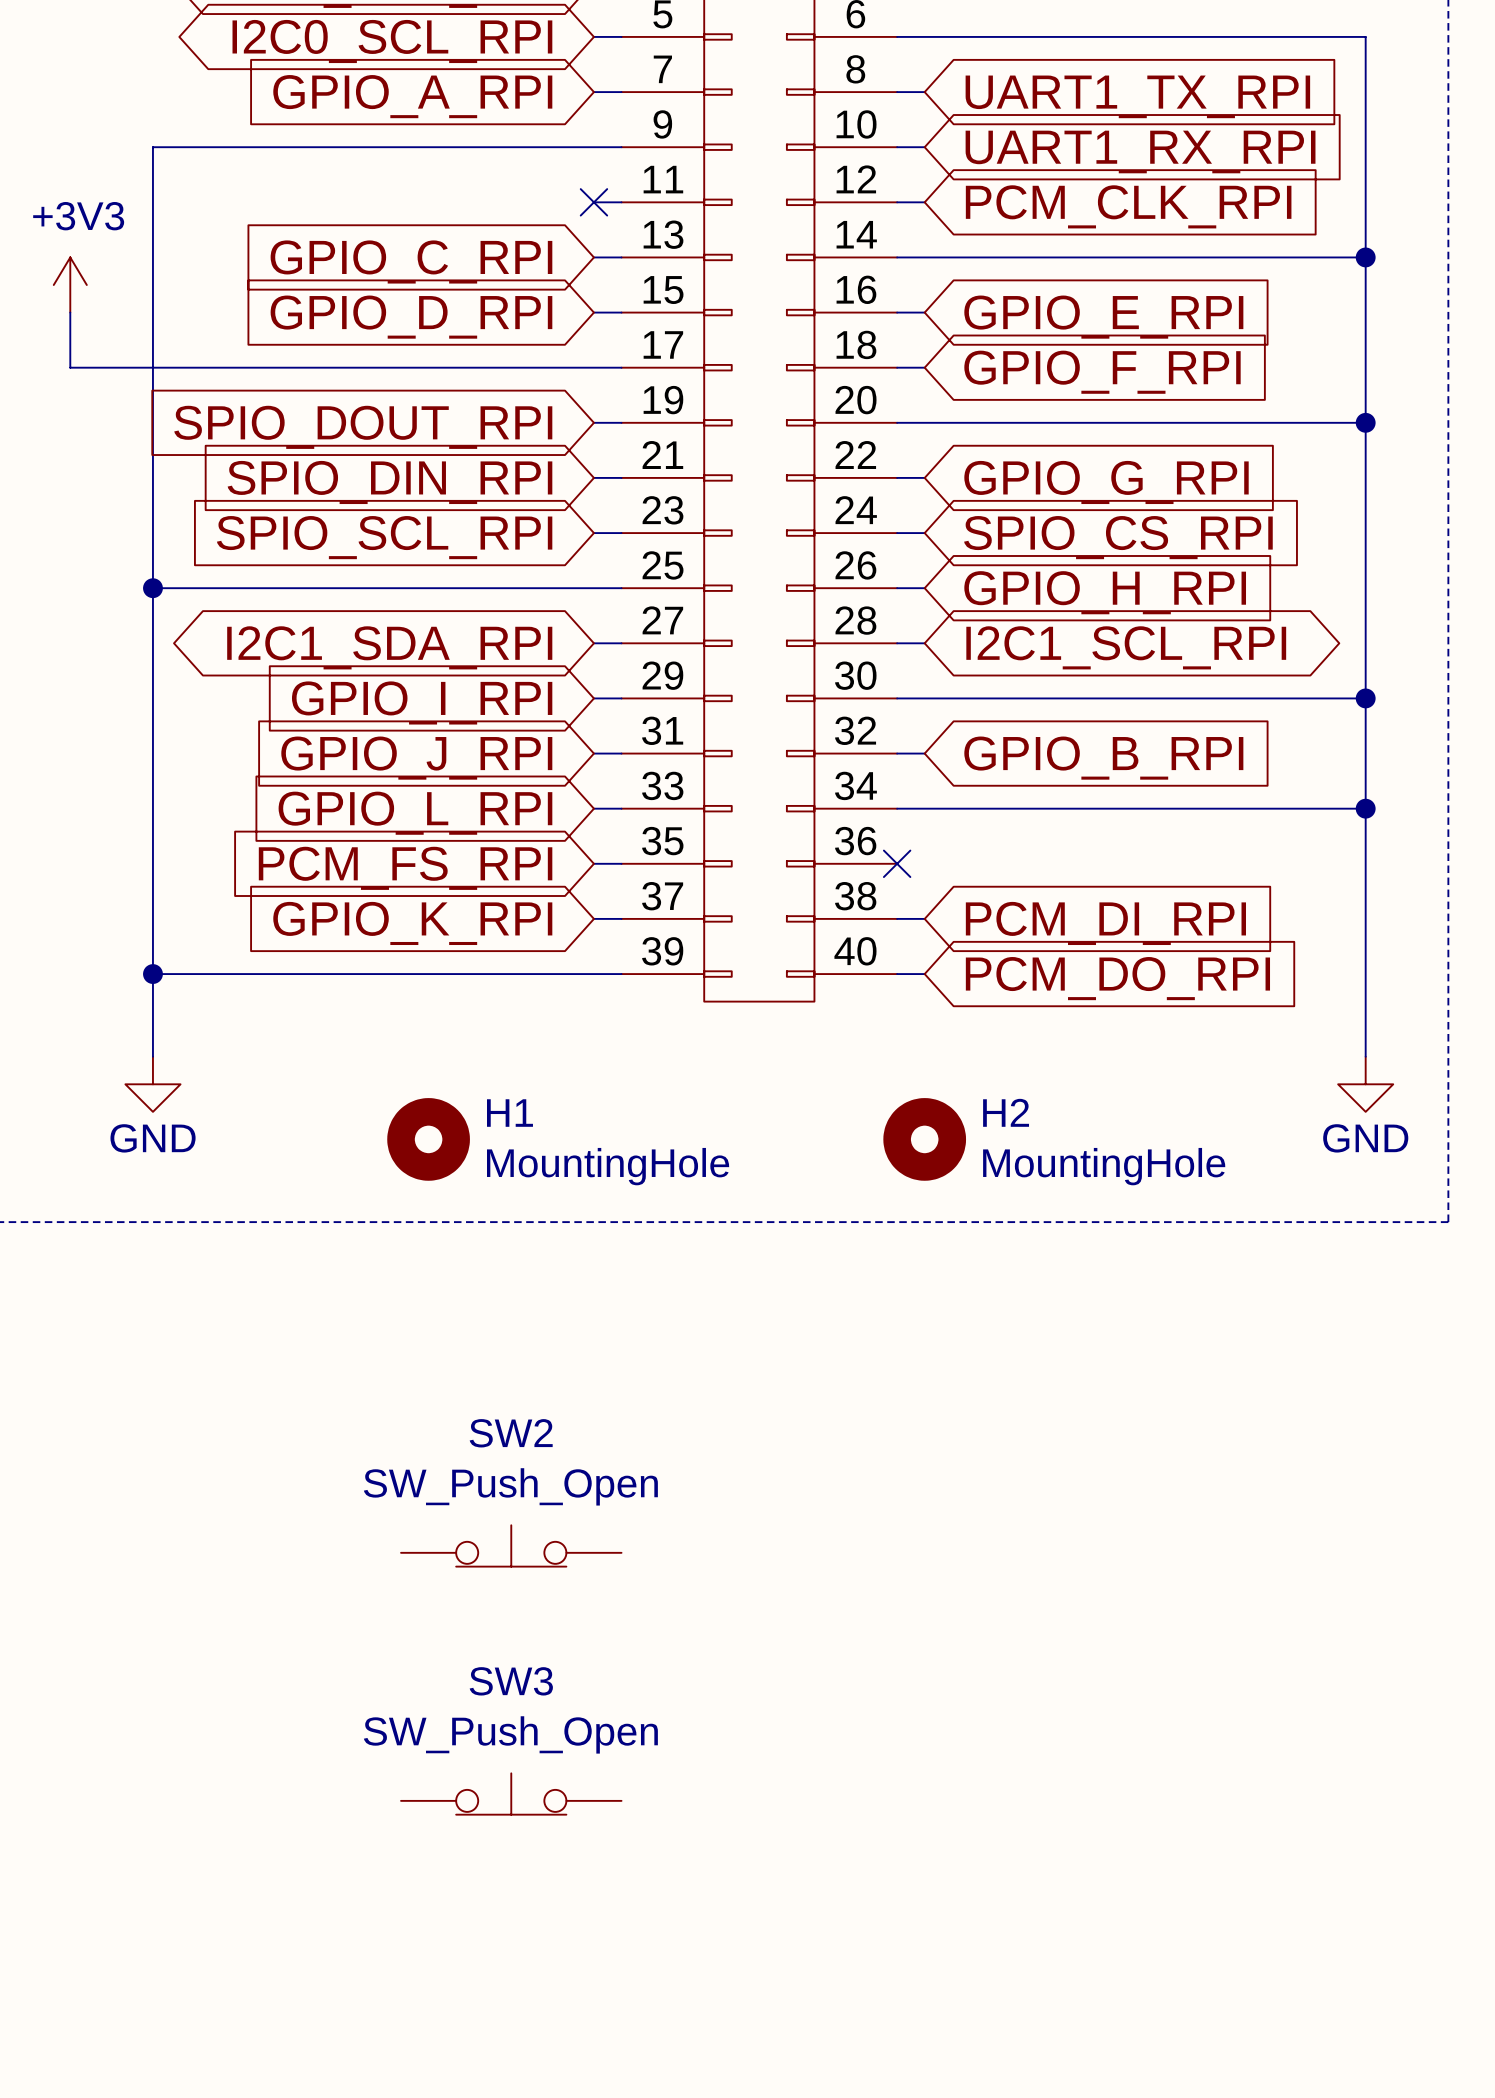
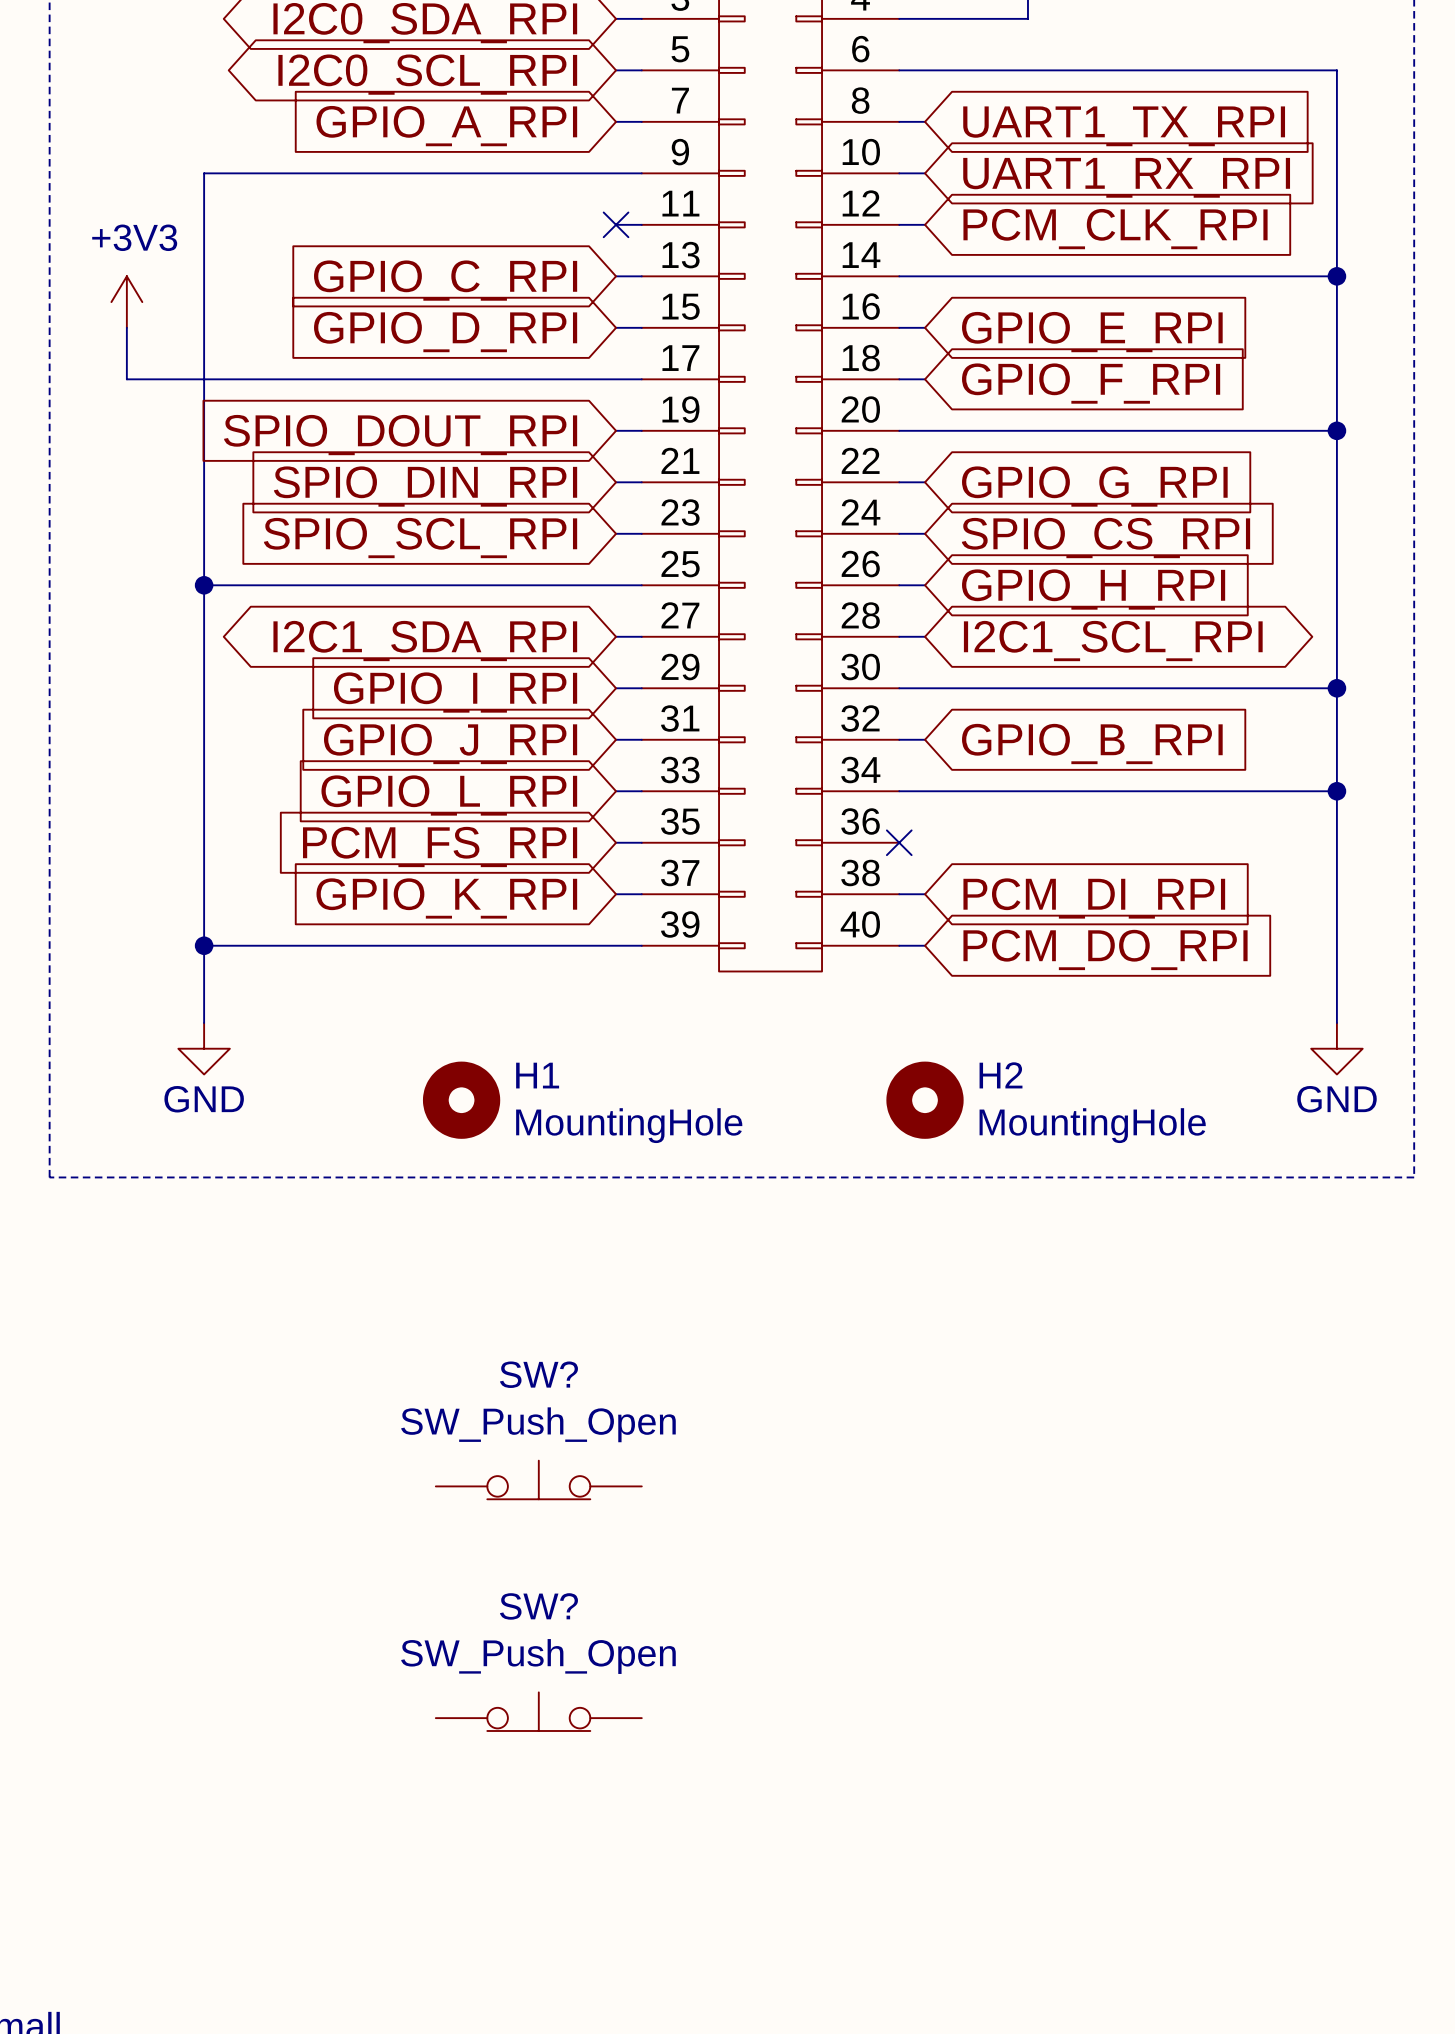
SW2 name: SW2 (511, 1433) -> SW? (538, 1374)
SW3 name: SW3 (511, 1681) -> SW? (538, 1606)

